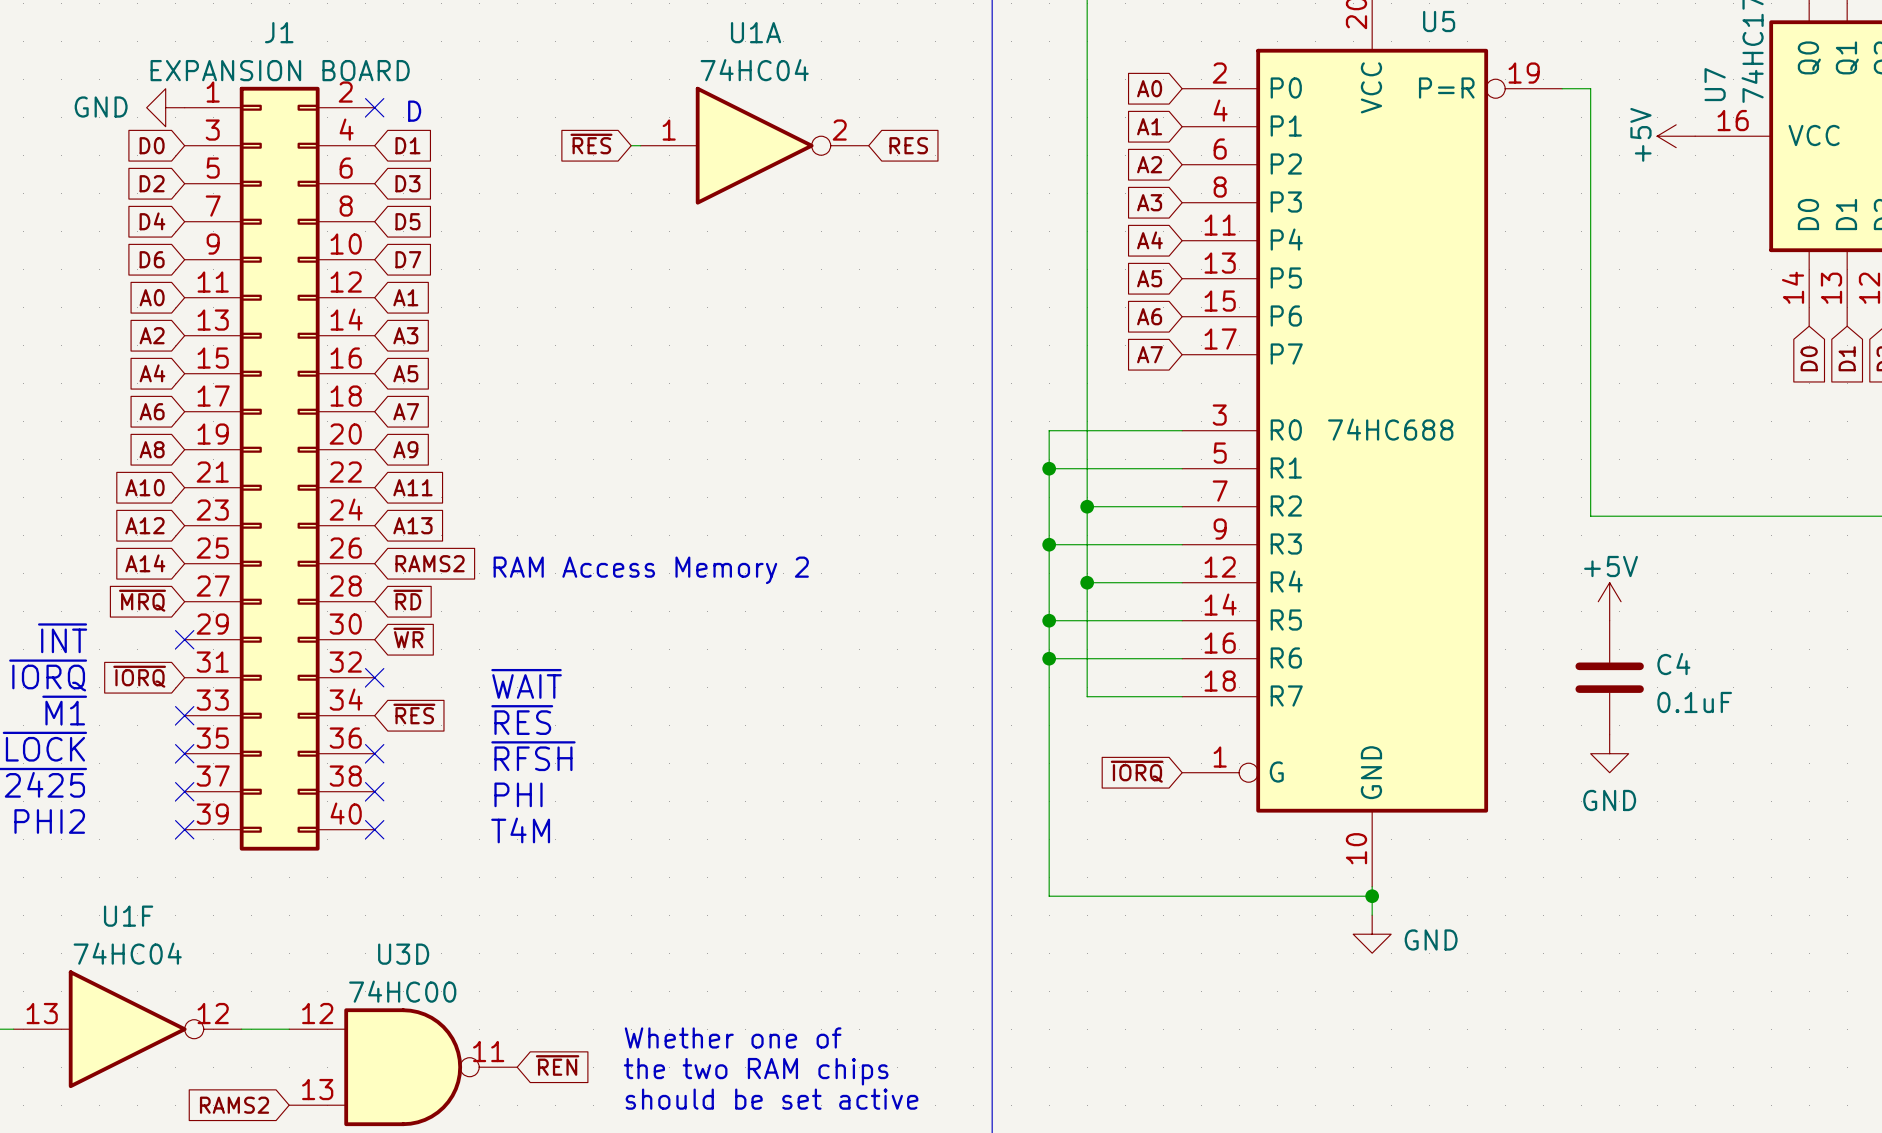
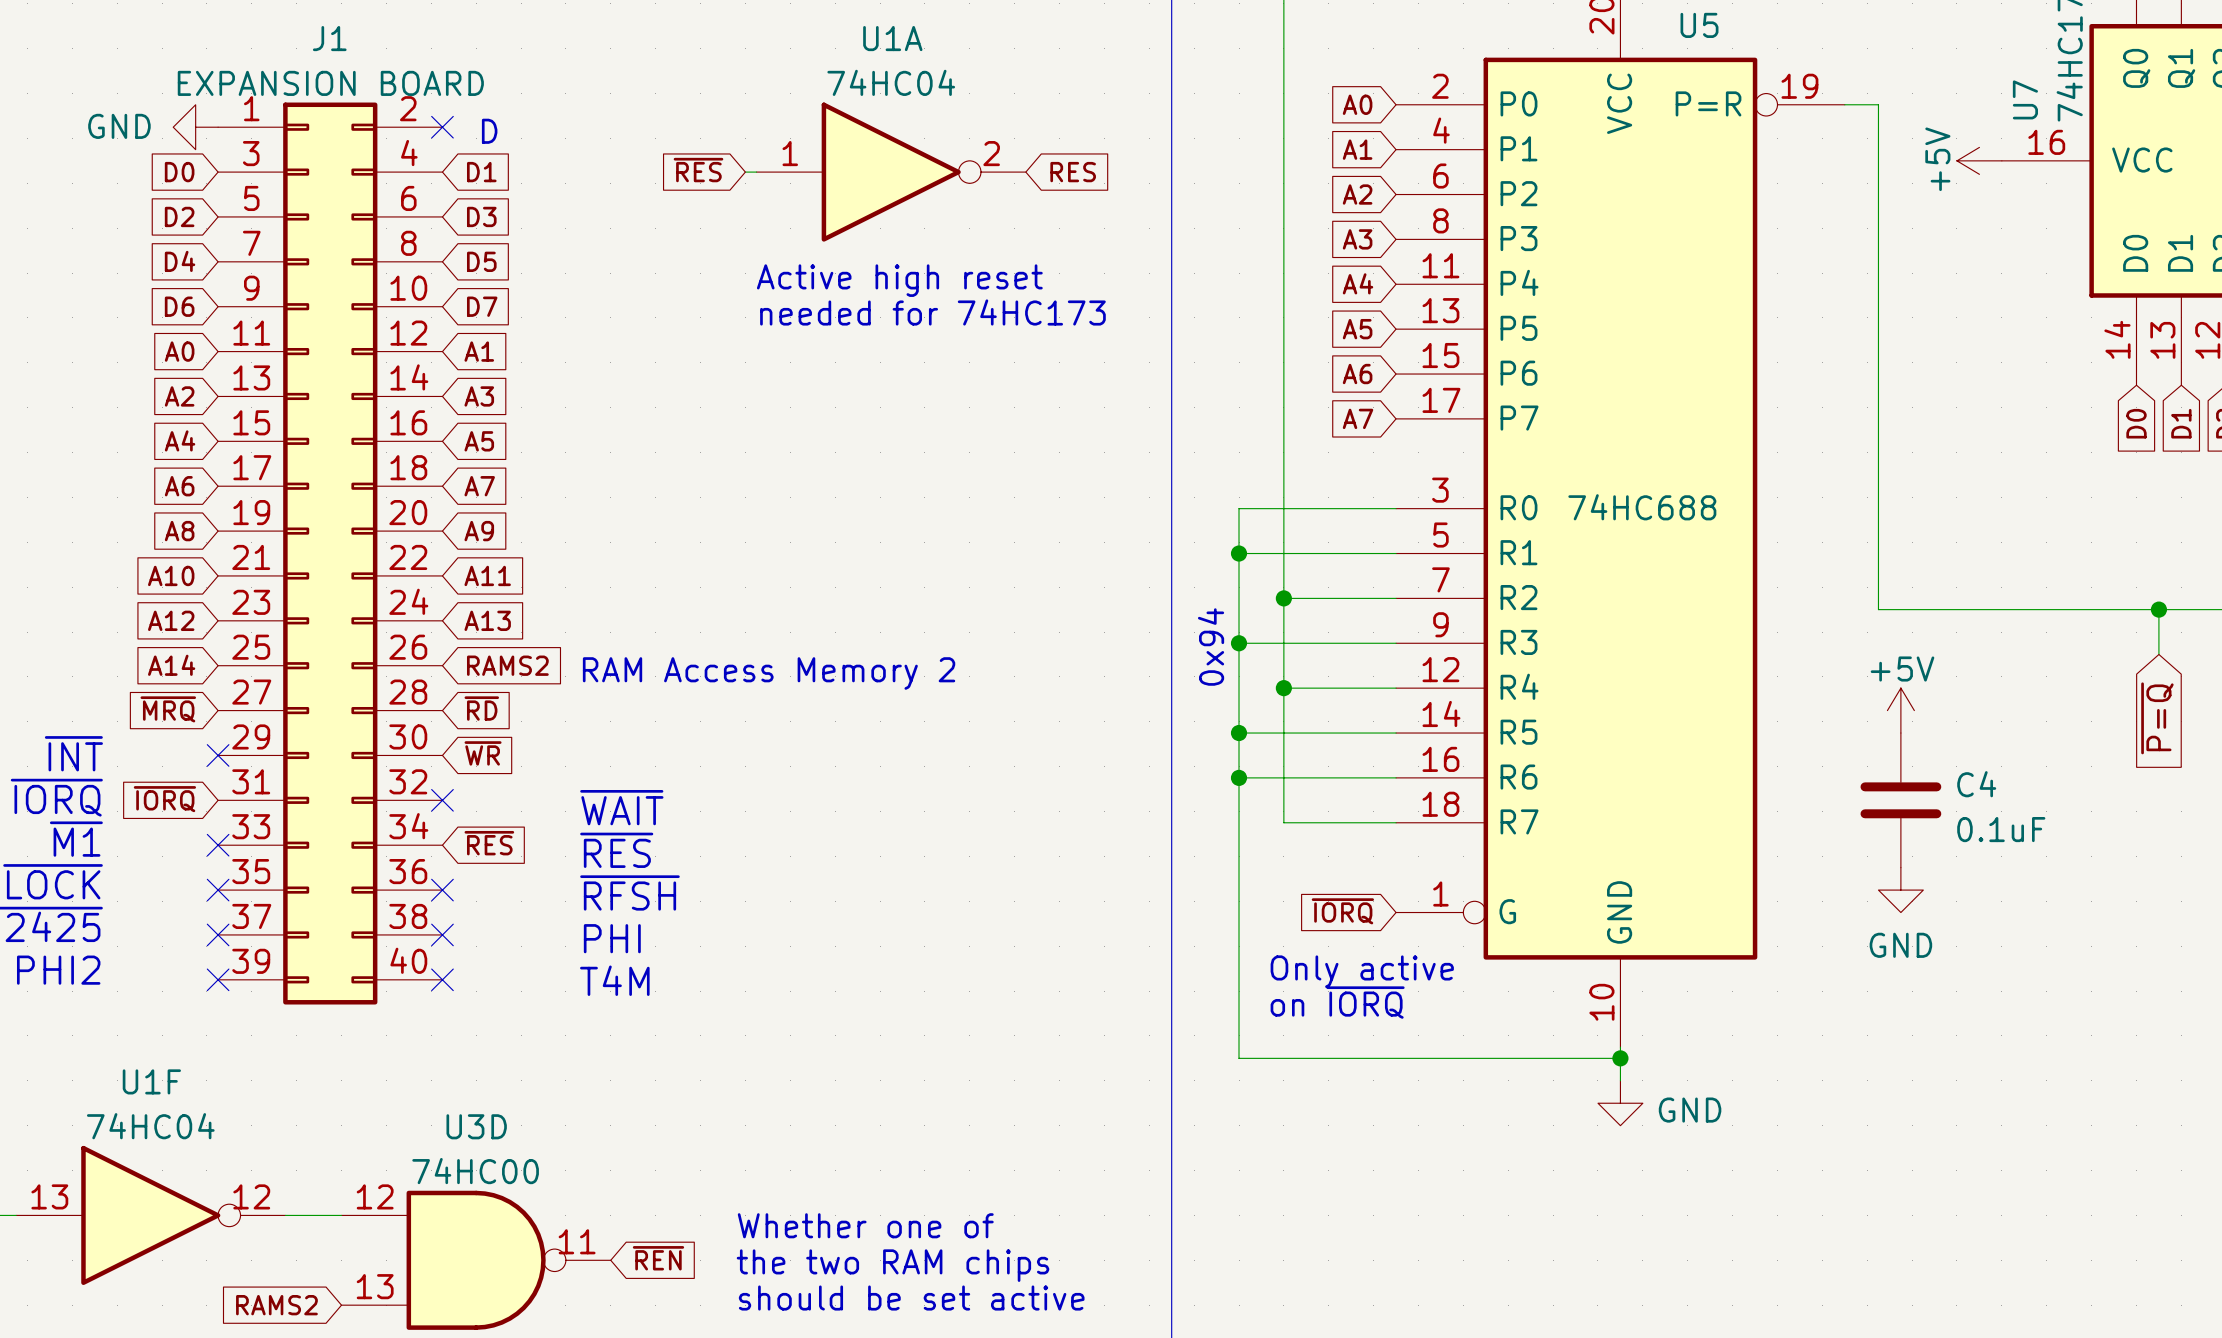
text: none -> Active high reset (899, 280)
text: none -> needed for 74HC173 (932, 312)
wire: none -> (2158, 609) (2158, 654)
junction: none -> (2158, 609)
text: none -> 0x94 (1211, 647)
global label: none -> ~{P=Q} (2157, 718)
text: none -> Only active (1362, 971)
text: none -> on ~{IORQ} (1337, 1002)

